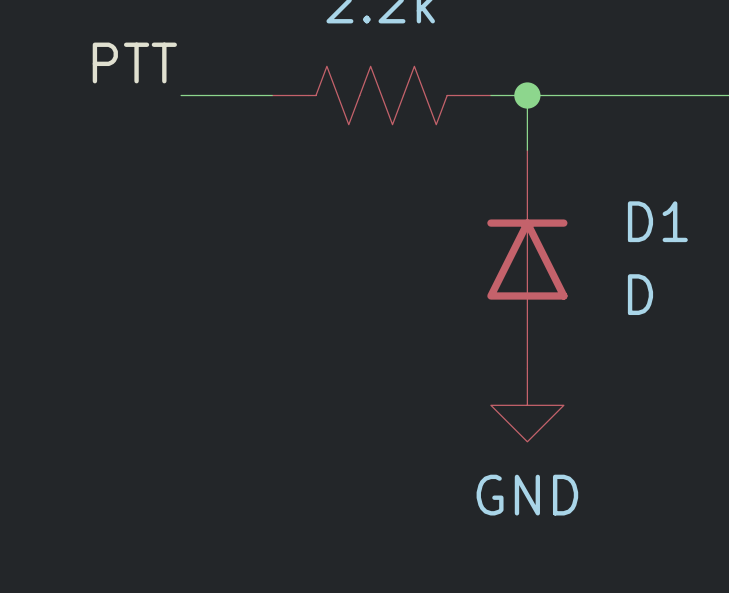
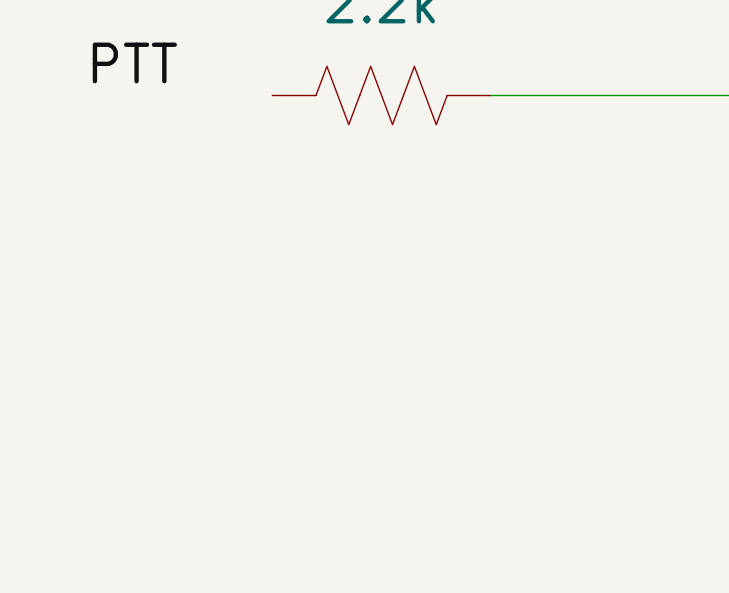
wire: (181, 95) (272, 95) -> none
wire: (527, 95) (527, 150) -> none
junction: (527, 95) -> none
D1: D (527, 259) -> none
power symbol: GND (527, 405) -> none

